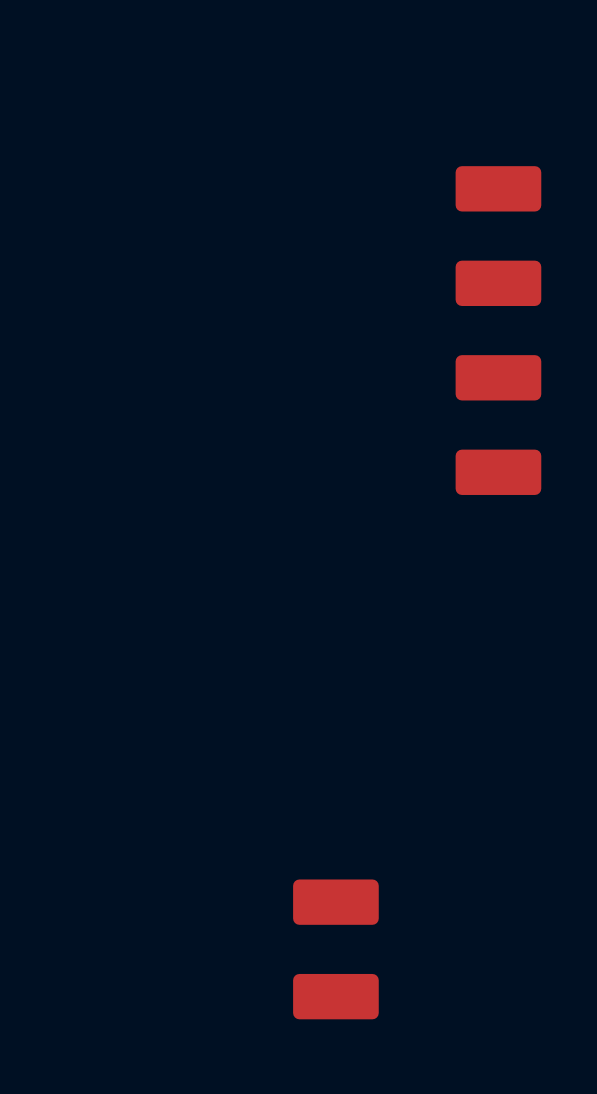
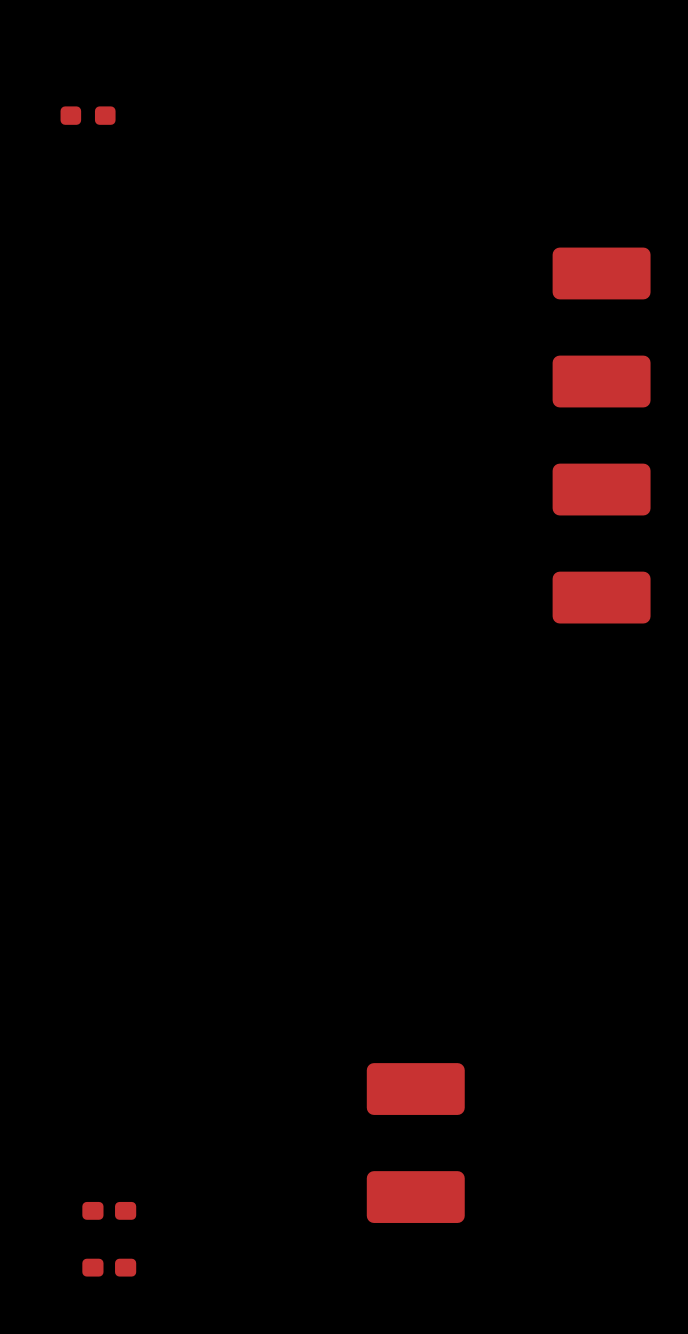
part: none -> (88, 115)
part: none -> (109, 1210)
part: none -> (109, 1267)

